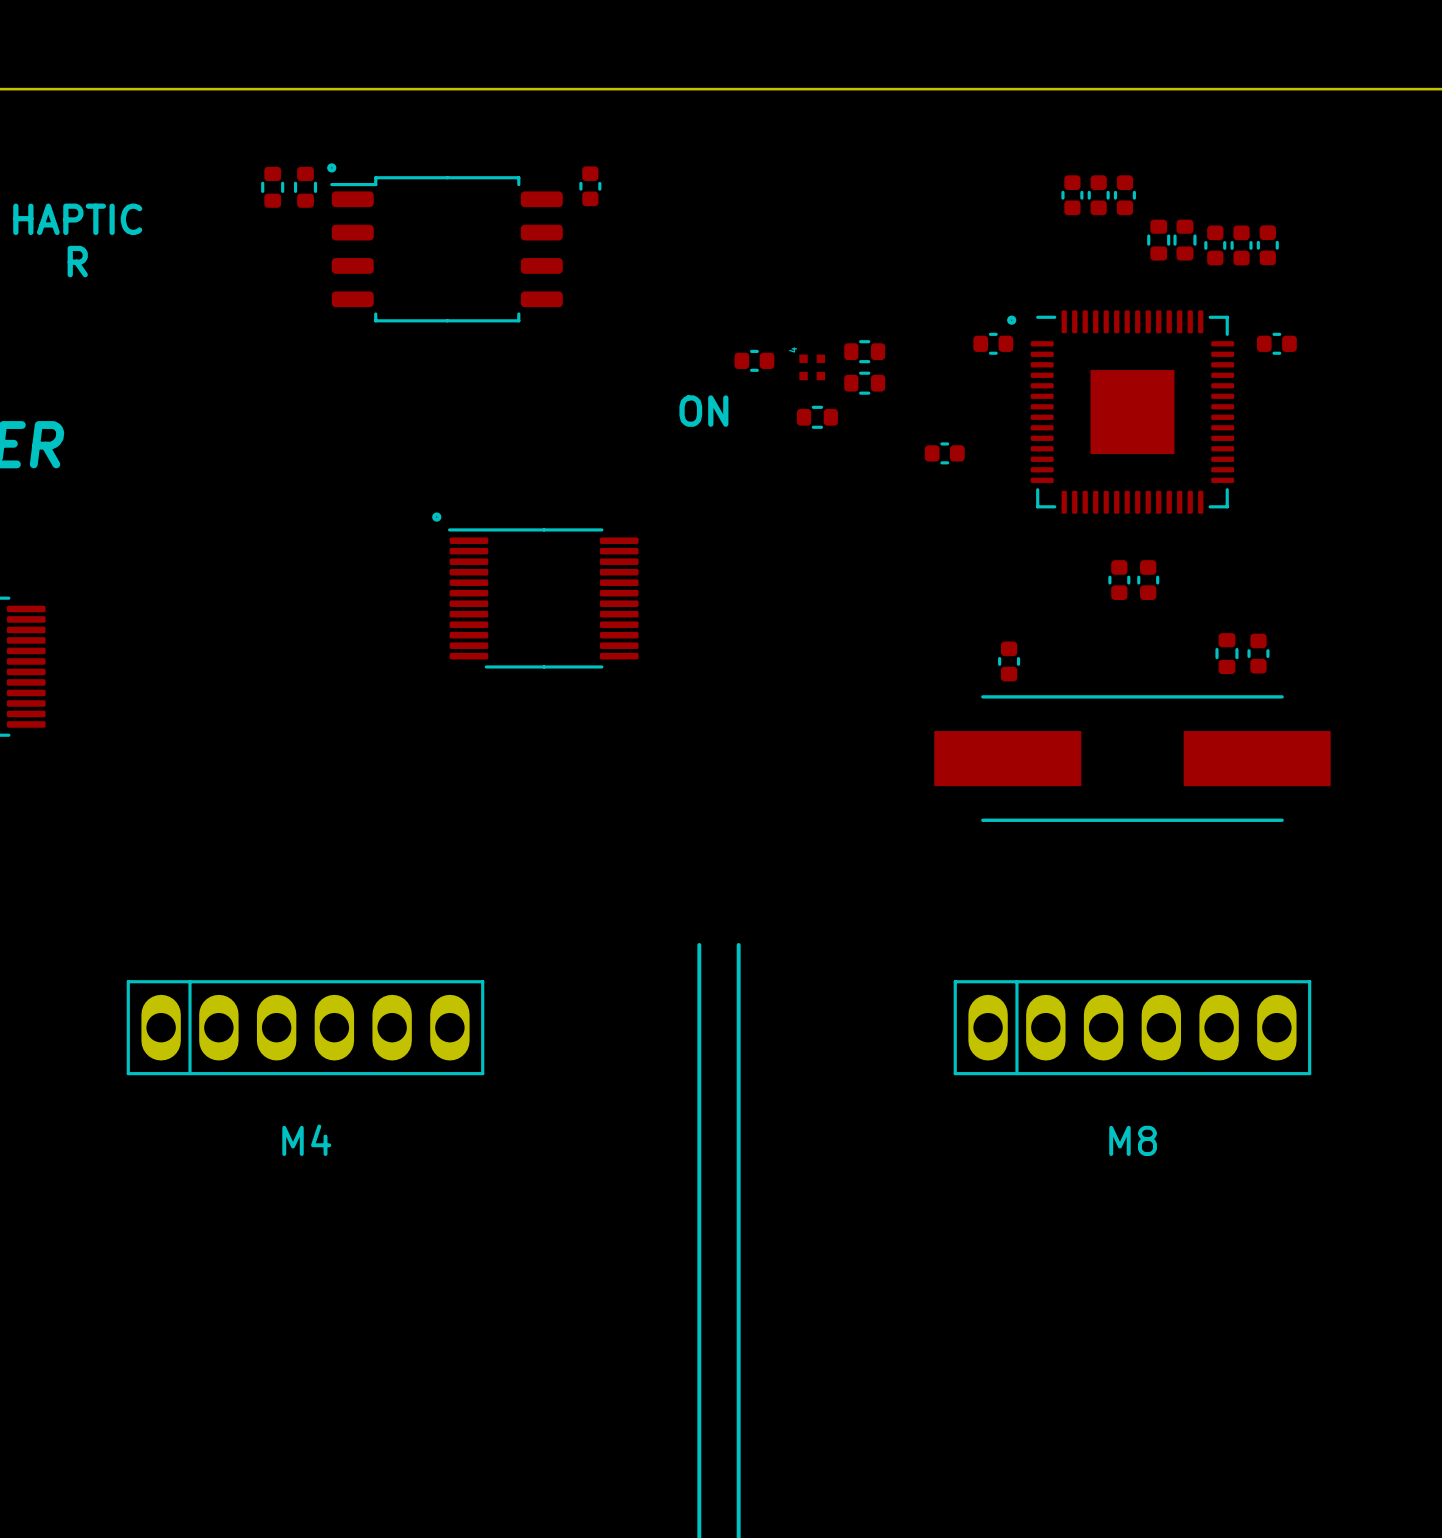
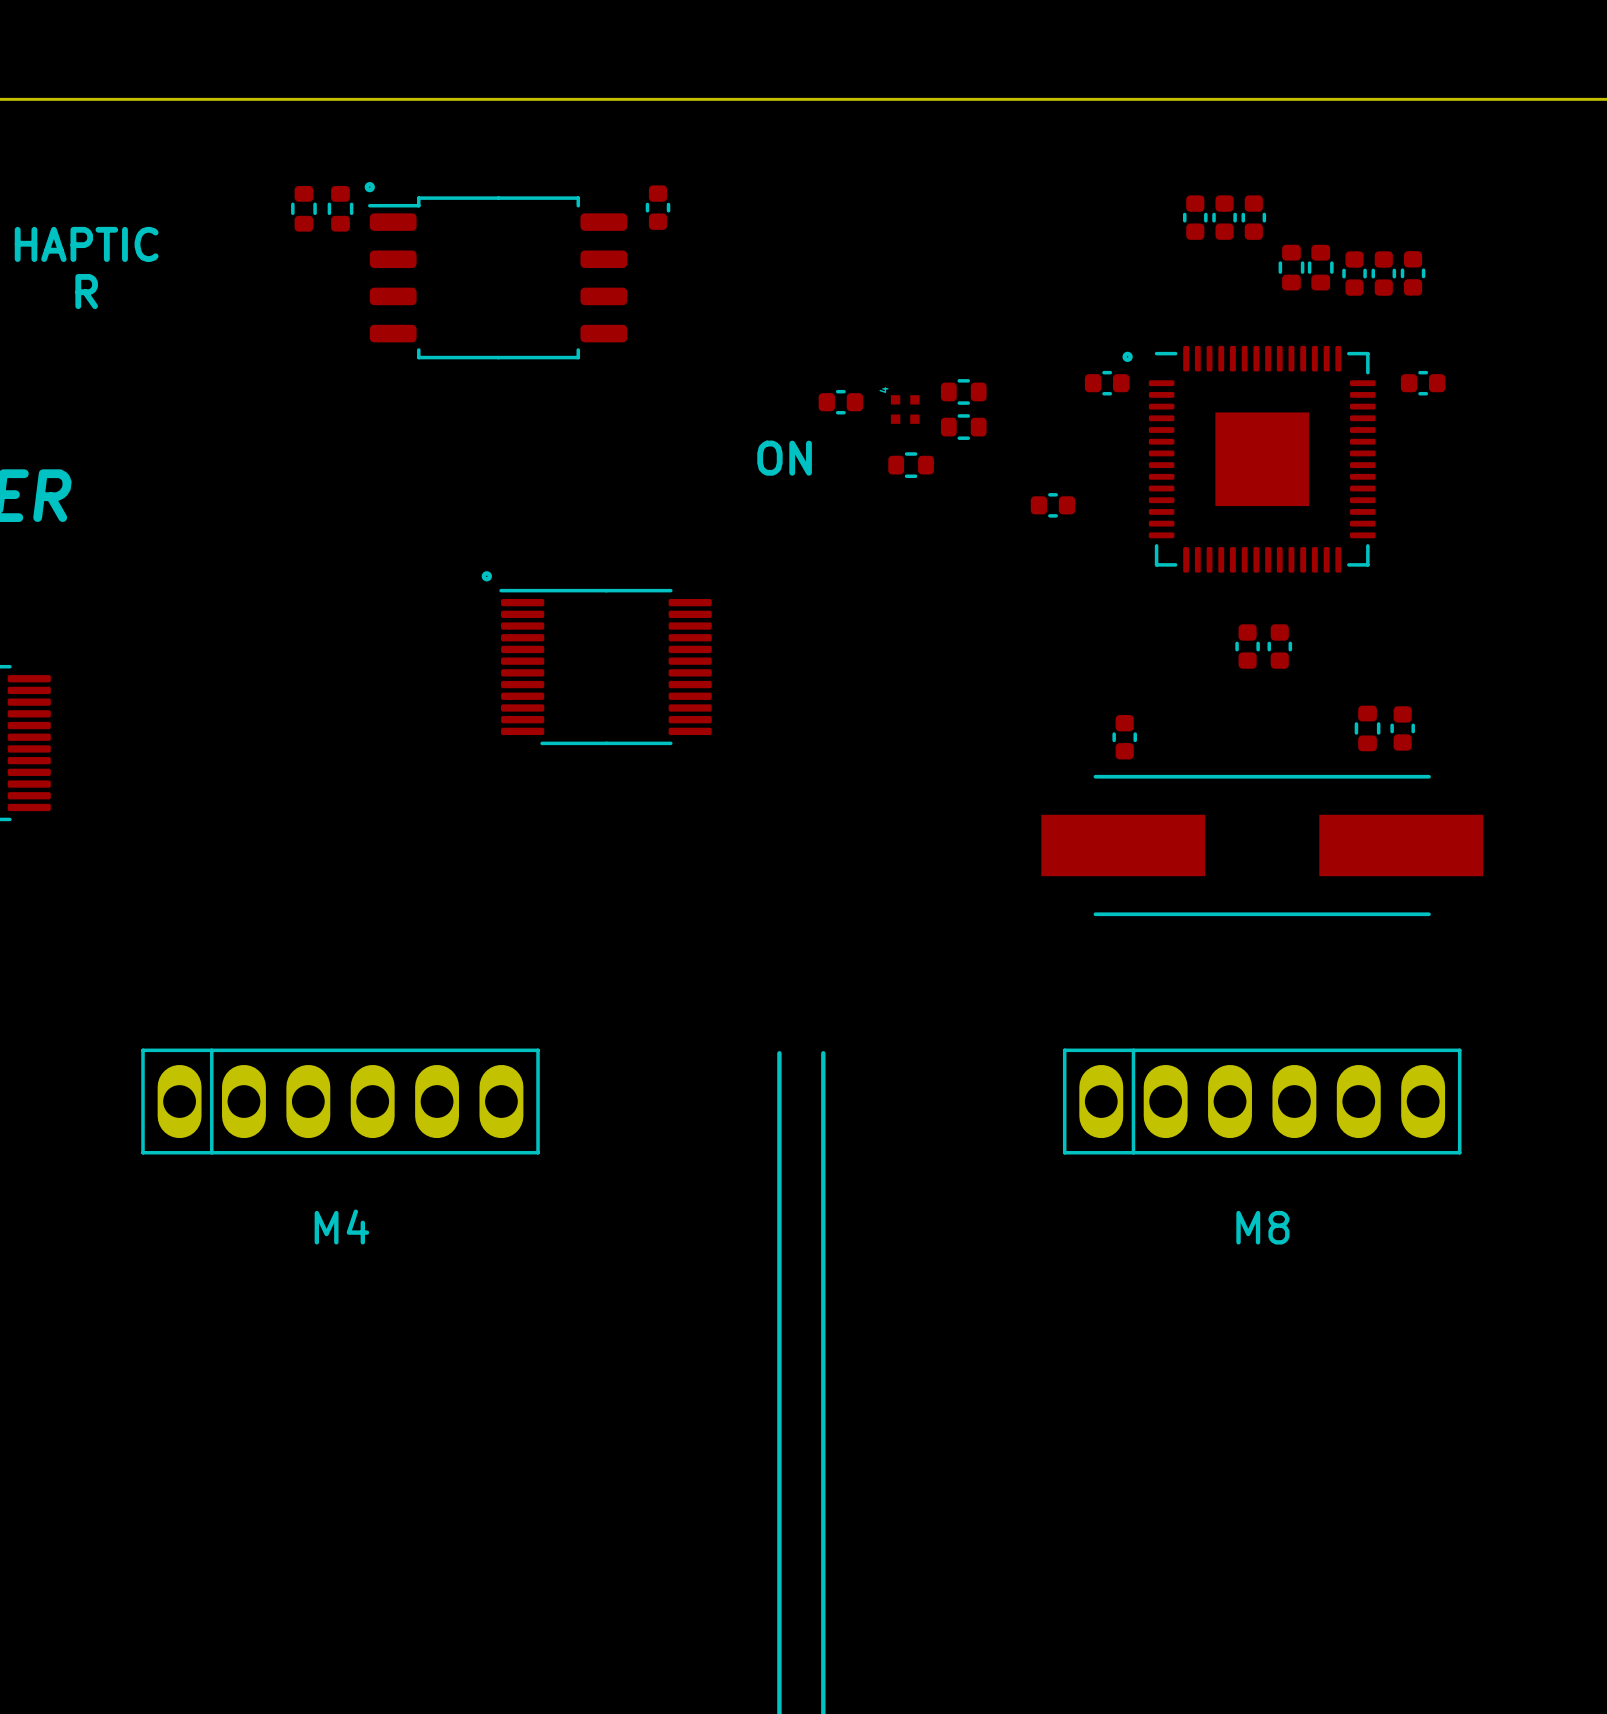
M4 position: (305, 1027) -> (340, 1101)
M8 position: (1132, 1027) -> (1262, 1101)

